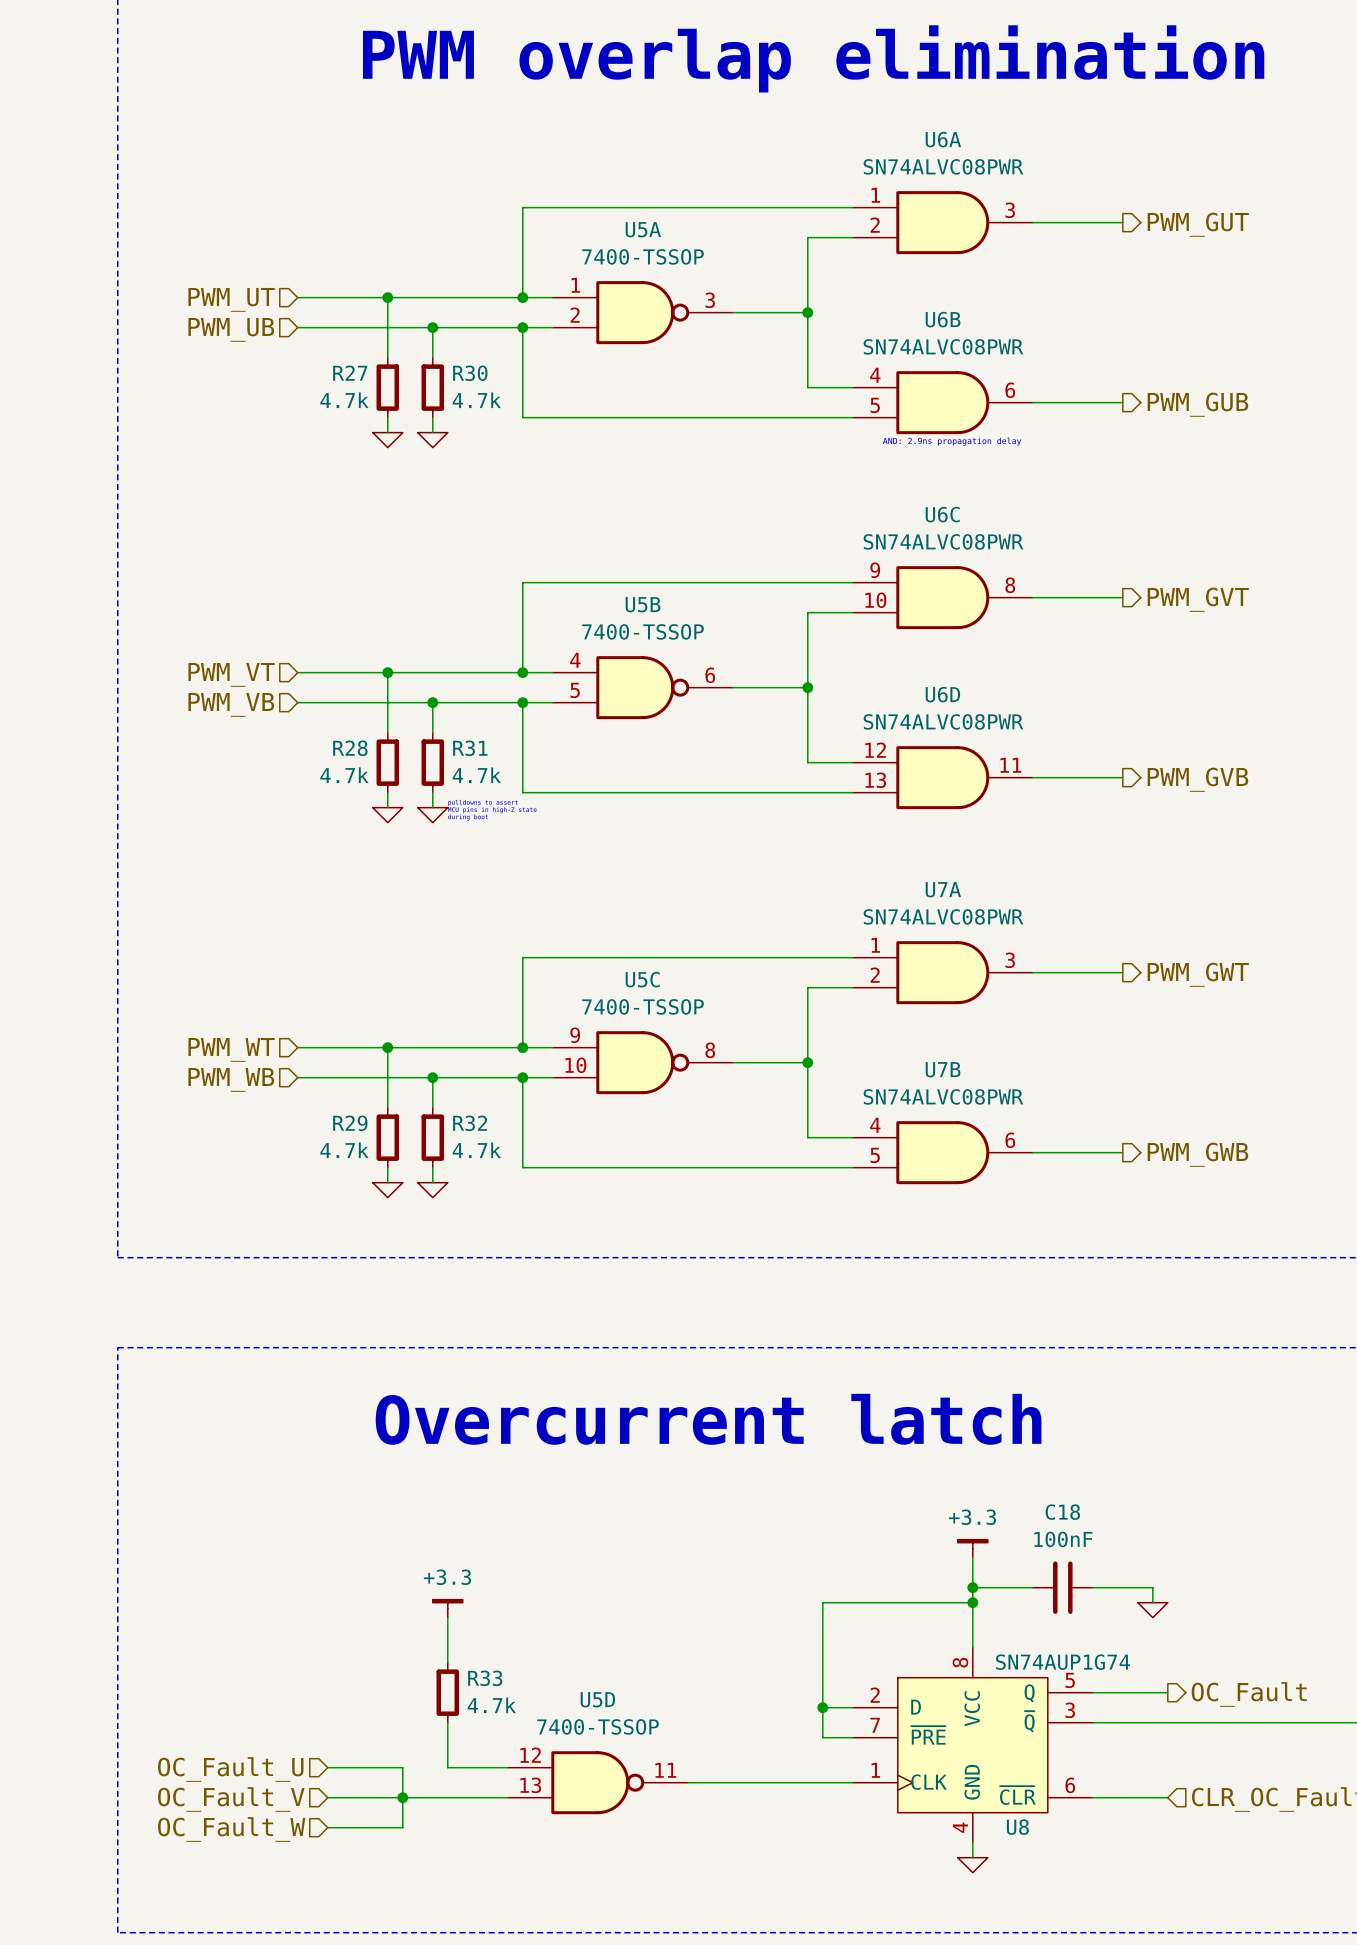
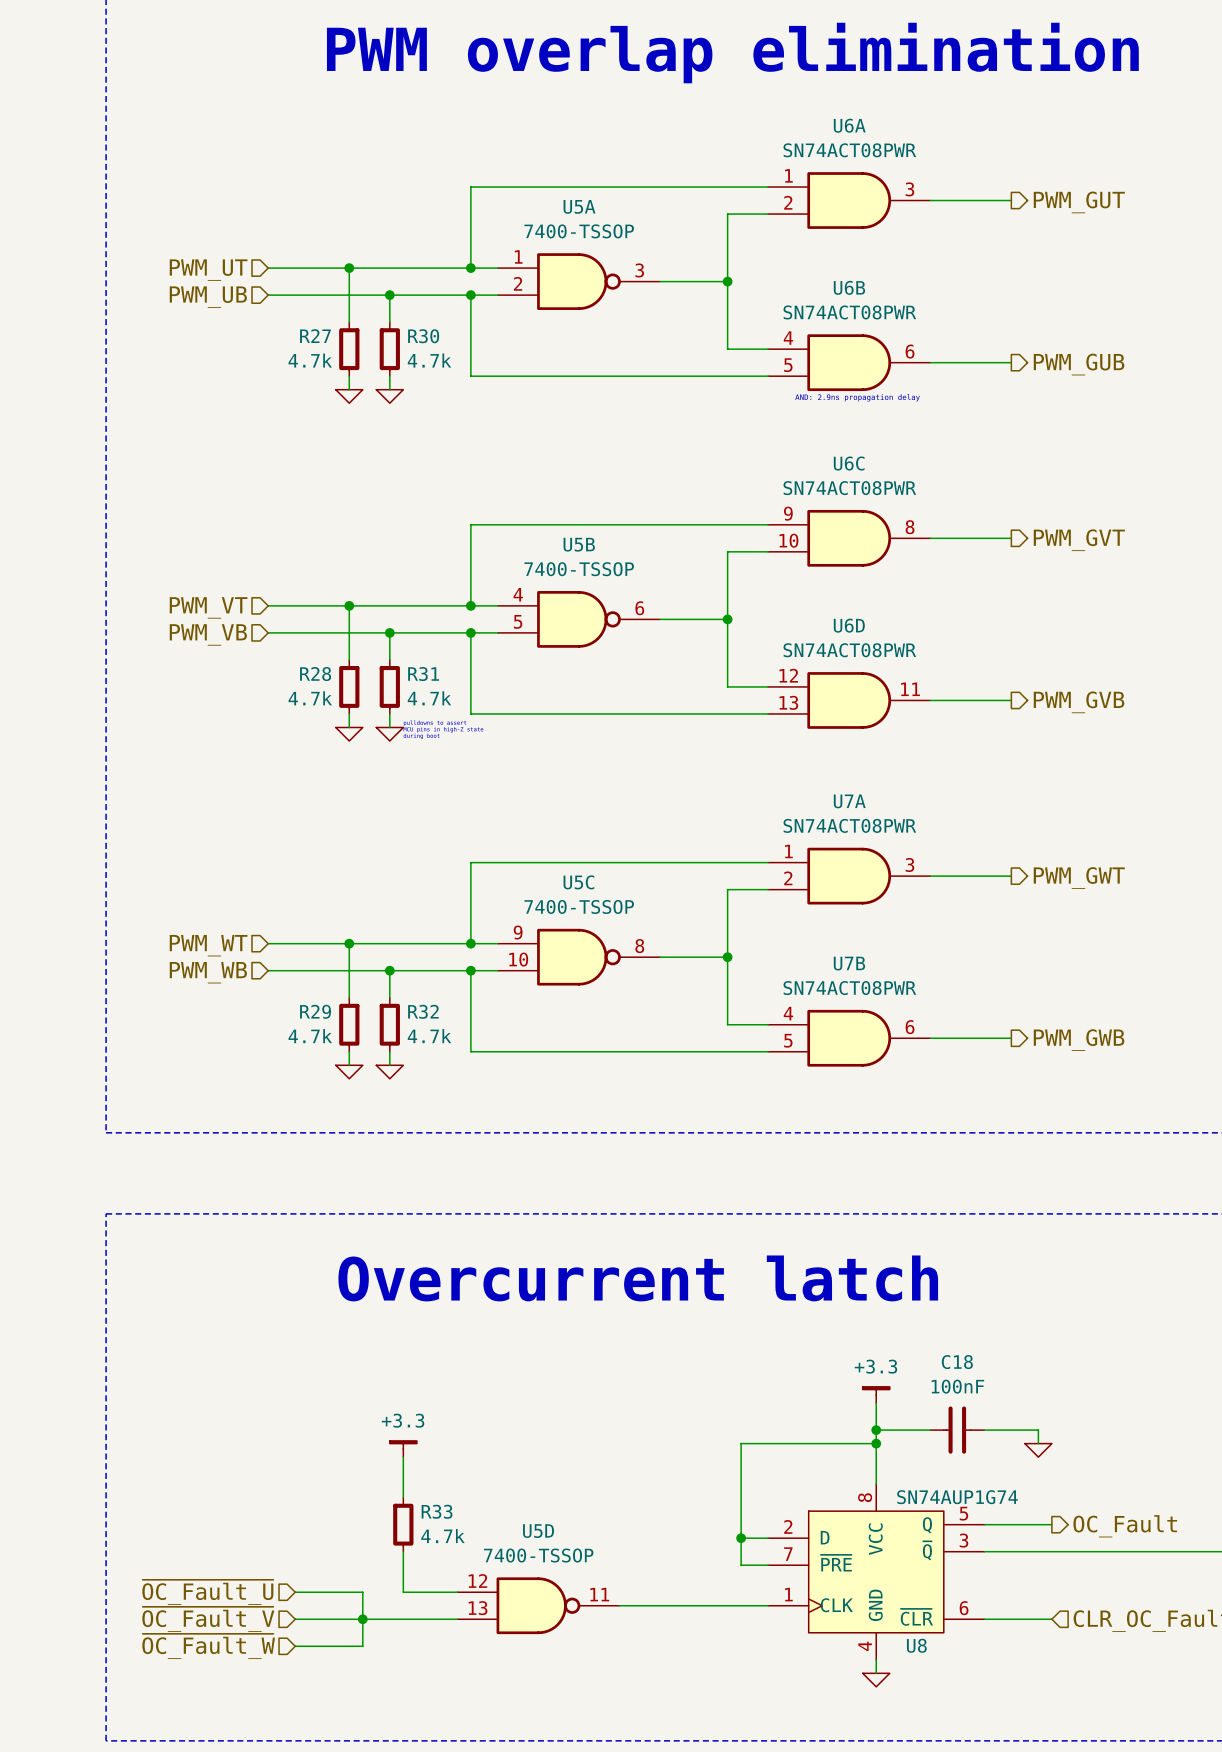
U6A value: SN74ALVC08PWR (943, 166) -> SN74ACT08PWR (849, 150)
U6B value: SN74ALVC08PWR (943, 346) -> SN74ACT08PWR (849, 312)
U6C value: SN74ALVC08PWR (943, 541) -> SN74ACT08PWR (849, 488)
U6D value: SN74ALVC08PWR (943, 721) -> SN74ACT08PWR (849, 650)
U7A value: SN74ALVC08PWR (943, 916) -> SN74ACT08PWR (849, 825)
U7B value: SN74ALVC08PWR (943, 1096) -> SN74ACT08PWR (849, 988)
hierarchical label: OC_Fault_U (230, 1769) -> ~{OC_Fault_U} (207, 1592)
hierarchical label: OC_Fault_V (231, 1799) -> ~{OC_Fault_V} (208, 1619)
hierarchical label: OC_Fault_W (231, 1829) -> ~{OC_Fault_W} (208, 1646)

